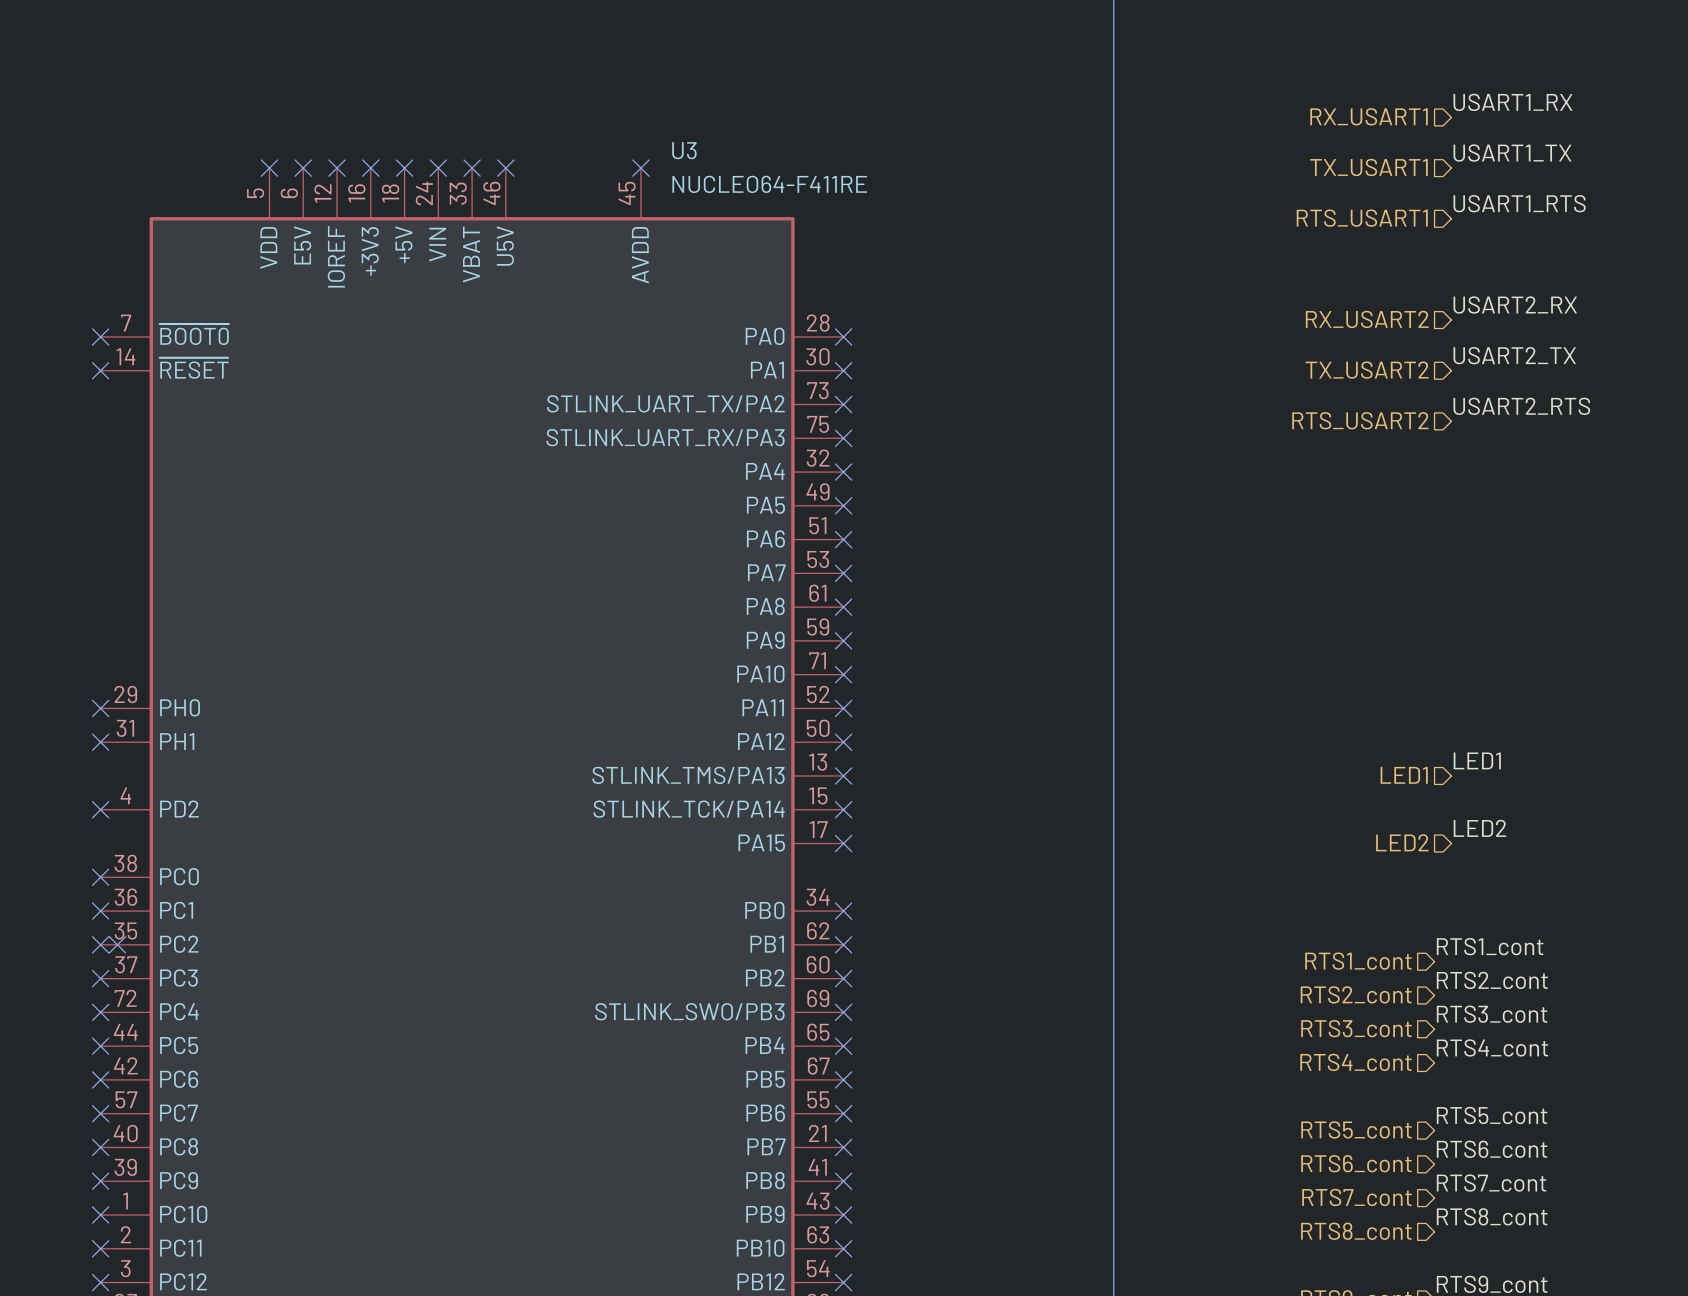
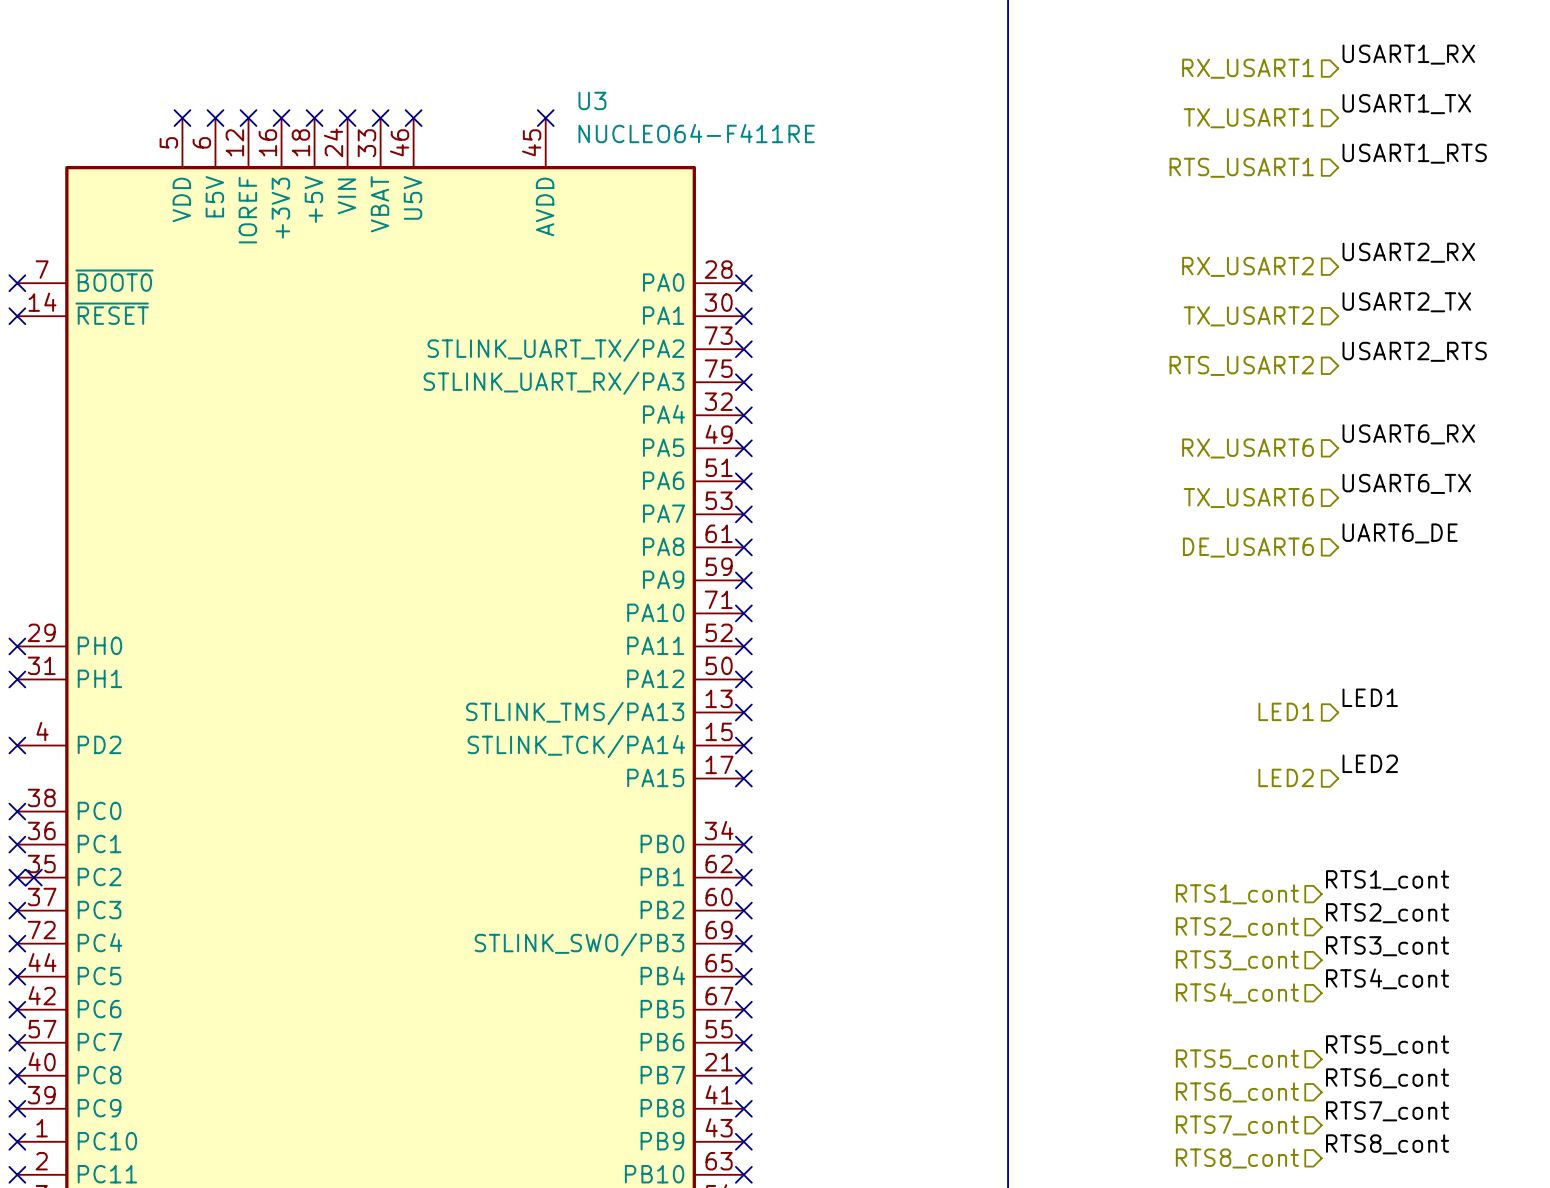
label: none -> USART6_RX (1408, 434)
hierarchical label: none -> RX_USART6 (1247, 448)
label: none -> USART6_TX (1406, 483)
hierarchical label: none -> TX_USART6 (1248, 498)
label: none -> UART6_DE (1400, 533)
hierarchical label: none -> DE_USART6 (1248, 547)

